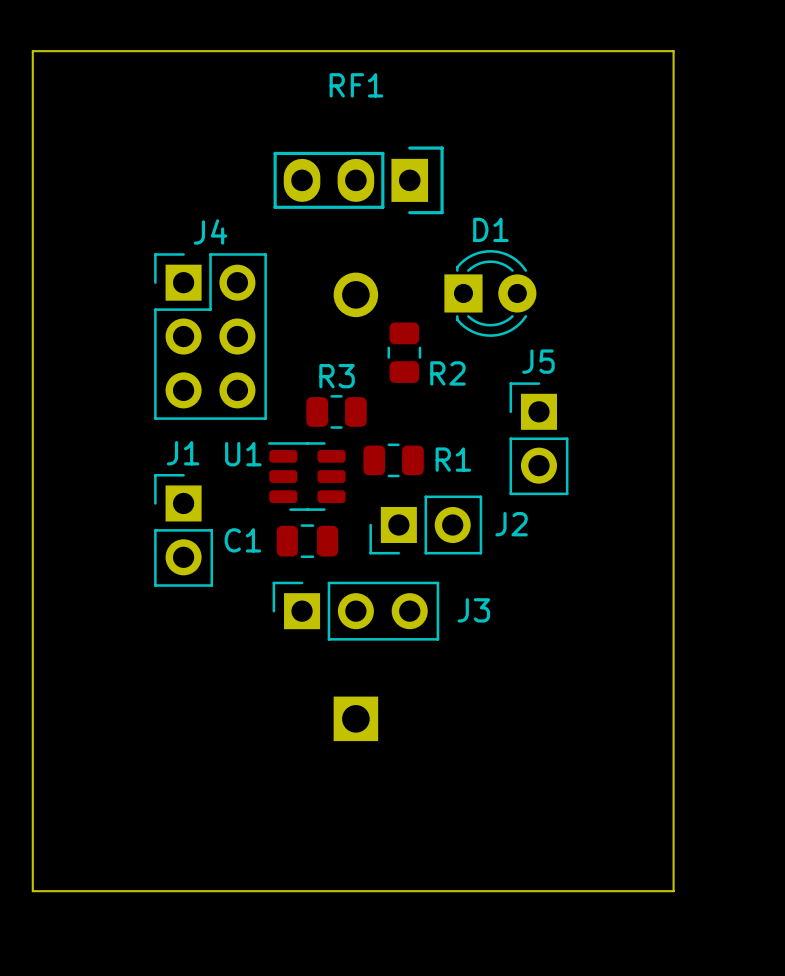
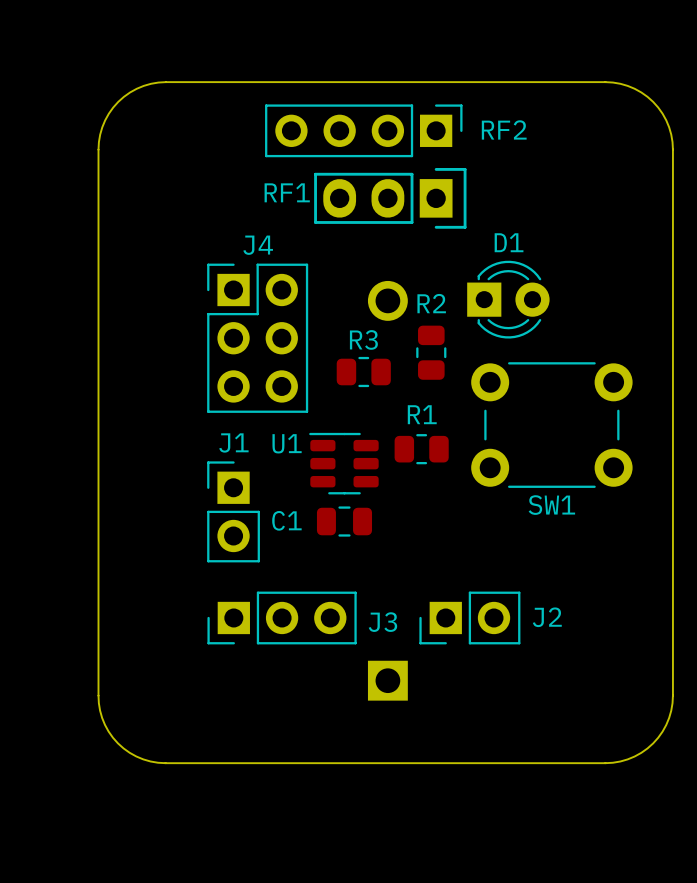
RF1 name position: RF1 (356, 85) -> RF1 (287, 192)
RF2: none -> (363, 130)
board edge: (32, 125) (32, 51) (673, 51) (673, 891) (32, 891) (32, 735) -> (98, 149) (102, 127) (108, 113) (118, 101) (136, 88) (151, 83) (166, 82) (612, 82) (634, 88) (647, 96) (658, 107) (669, 127) (672, 149) (672, 695) (669, 717) (662, 731) (653, 743) (634, 756) (620, 761) (605, 763) (158, 762) (143, 759) (129, 752) (112, 737) (102, 717) (98, 695)
R2 name position: R2 (447, 373) -> R2 (431, 303)
R3 position: (336, 411) -> (363, 372)
SW1: none -> (551, 425)
J5: (538, 438) -> none
R1 name position: R1 (453, 459) -> R1 (422, 414)
J2 position: (425, 525) -> (469, 617)
J3 footprint: [272, 581, 440, 641] -> [207, 591, 357, 645]

